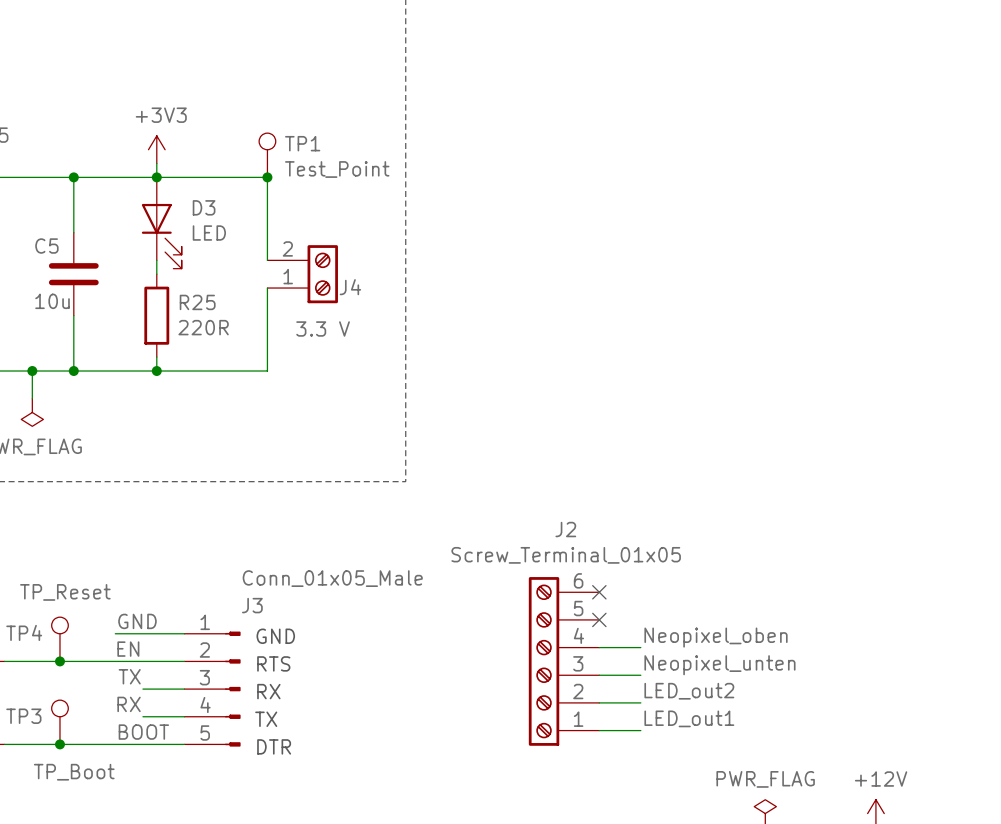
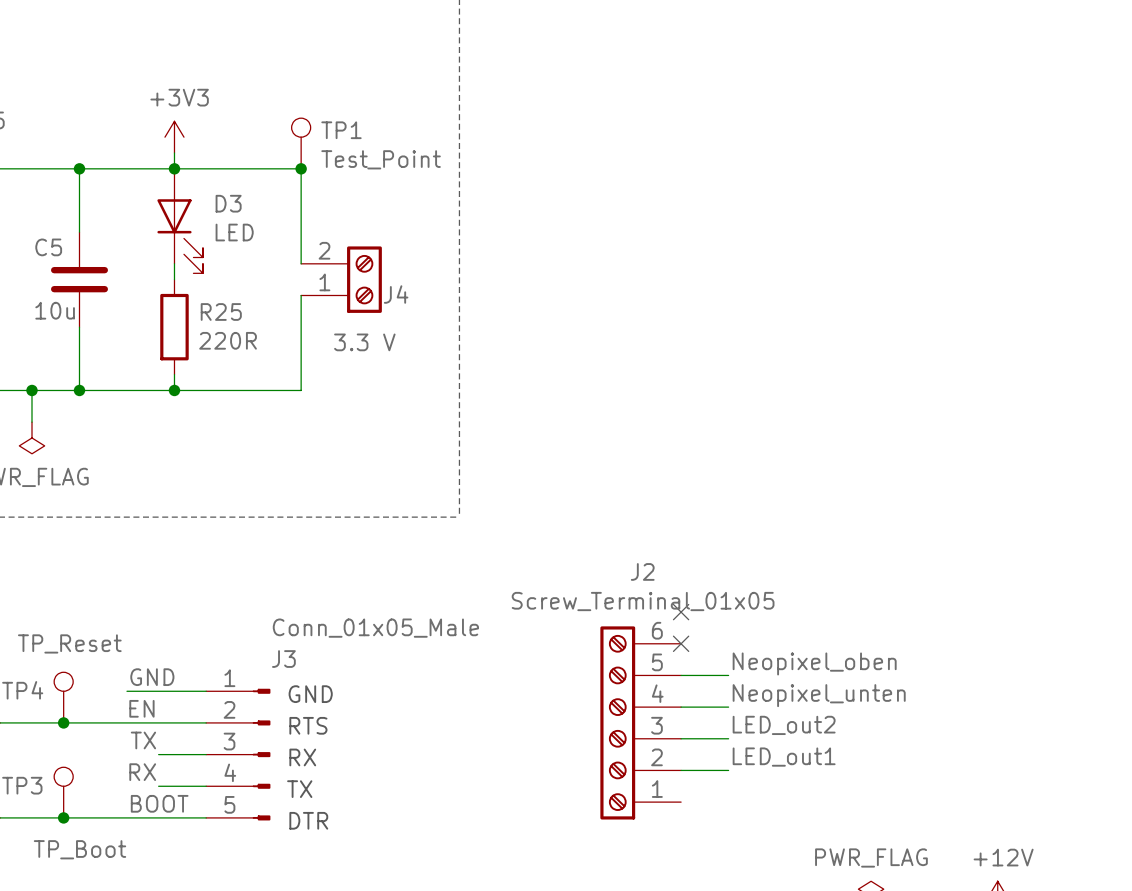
label: none -> Neopixel_oben (814, 663)
no-connect mark position: (599, 619) -> (681, 612)
label: Neopixel_oben (716, 637) -> Neopixel_unten (819, 695)
label: Neopixel_unten (719, 665) -> LED_out2 (784, 725)
label: LED_out2 (689, 691) -> LED_out1 (784, 757)
label: LED_out1 (689, 718) -> none
wire: (599, 730) (640, 730) -> (681, 675) (728, 675)

